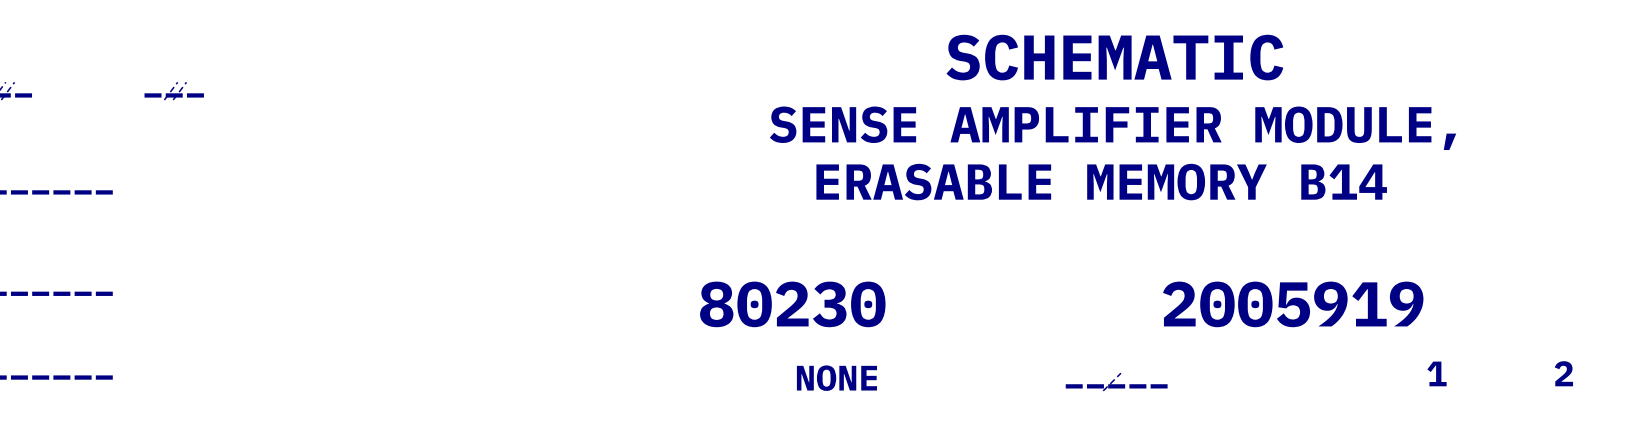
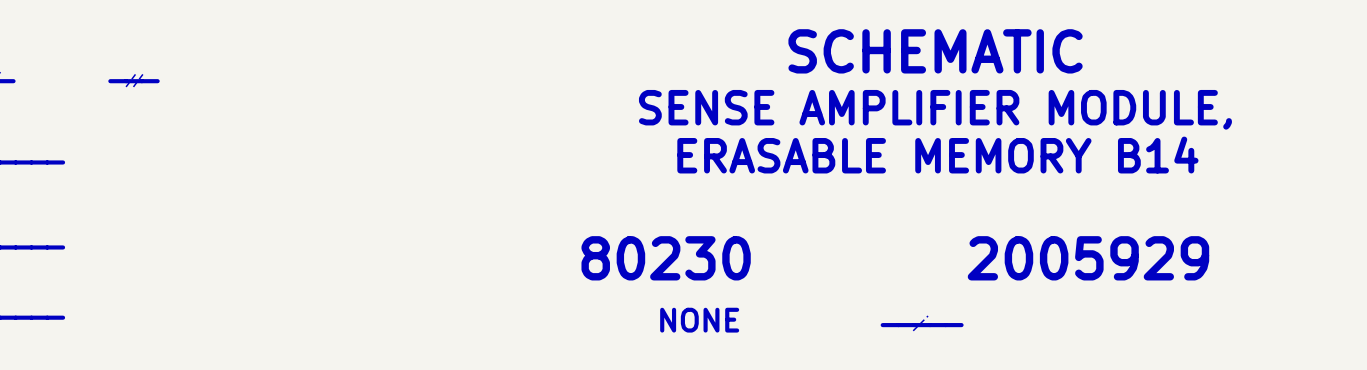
text: 2005919 (1293, 304) -> 2005929 (1088, 258)
text: 1 2 (1500, 373) -> none

